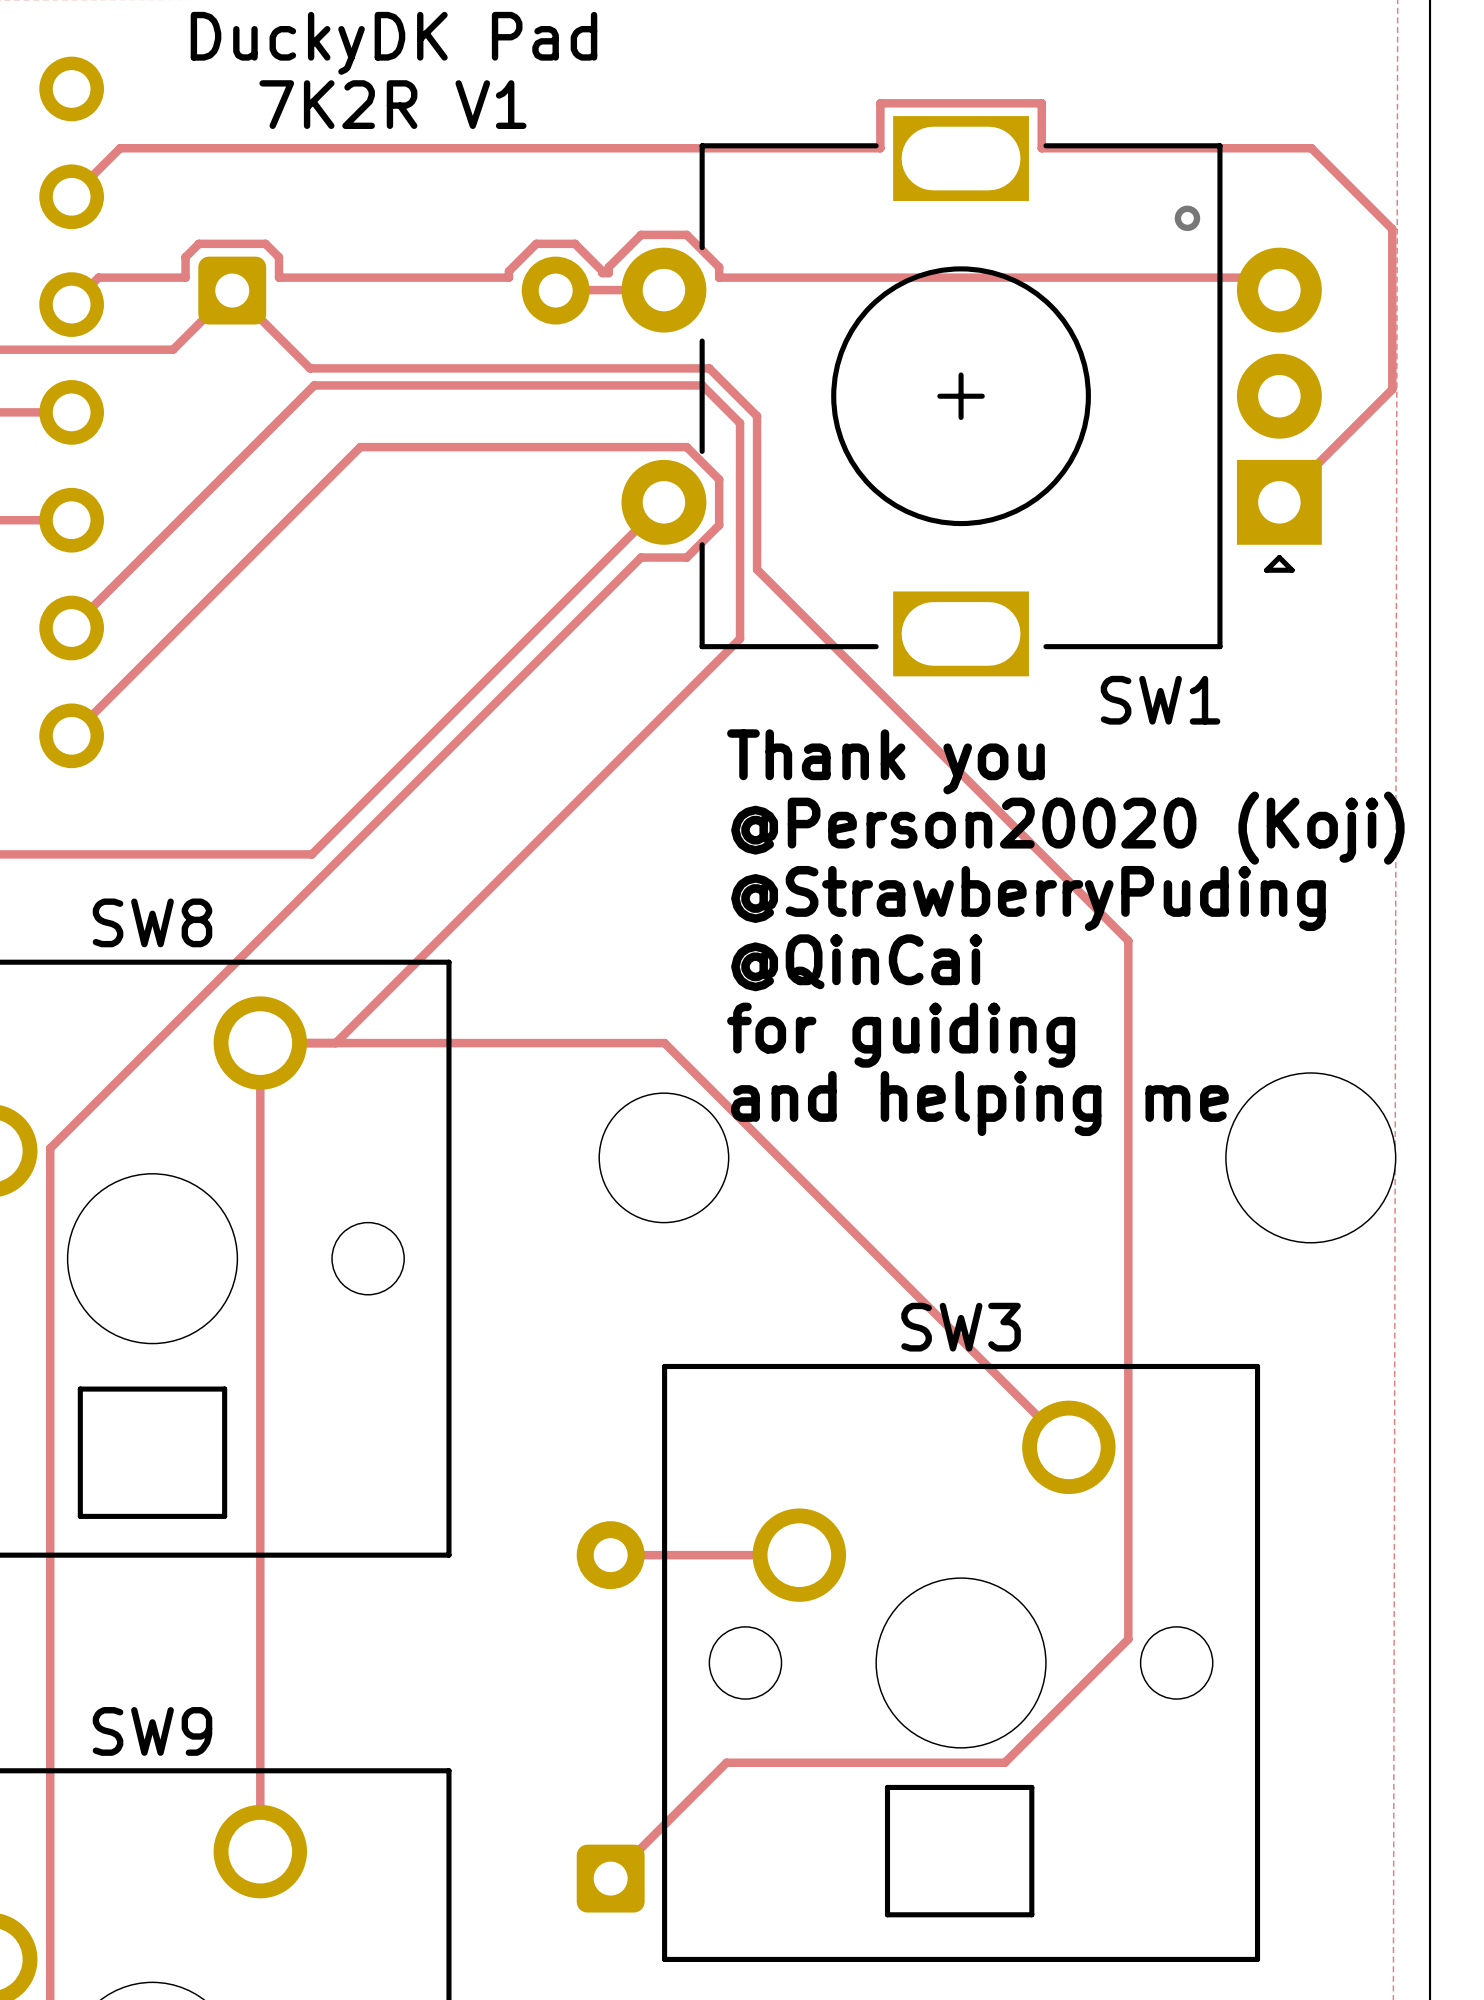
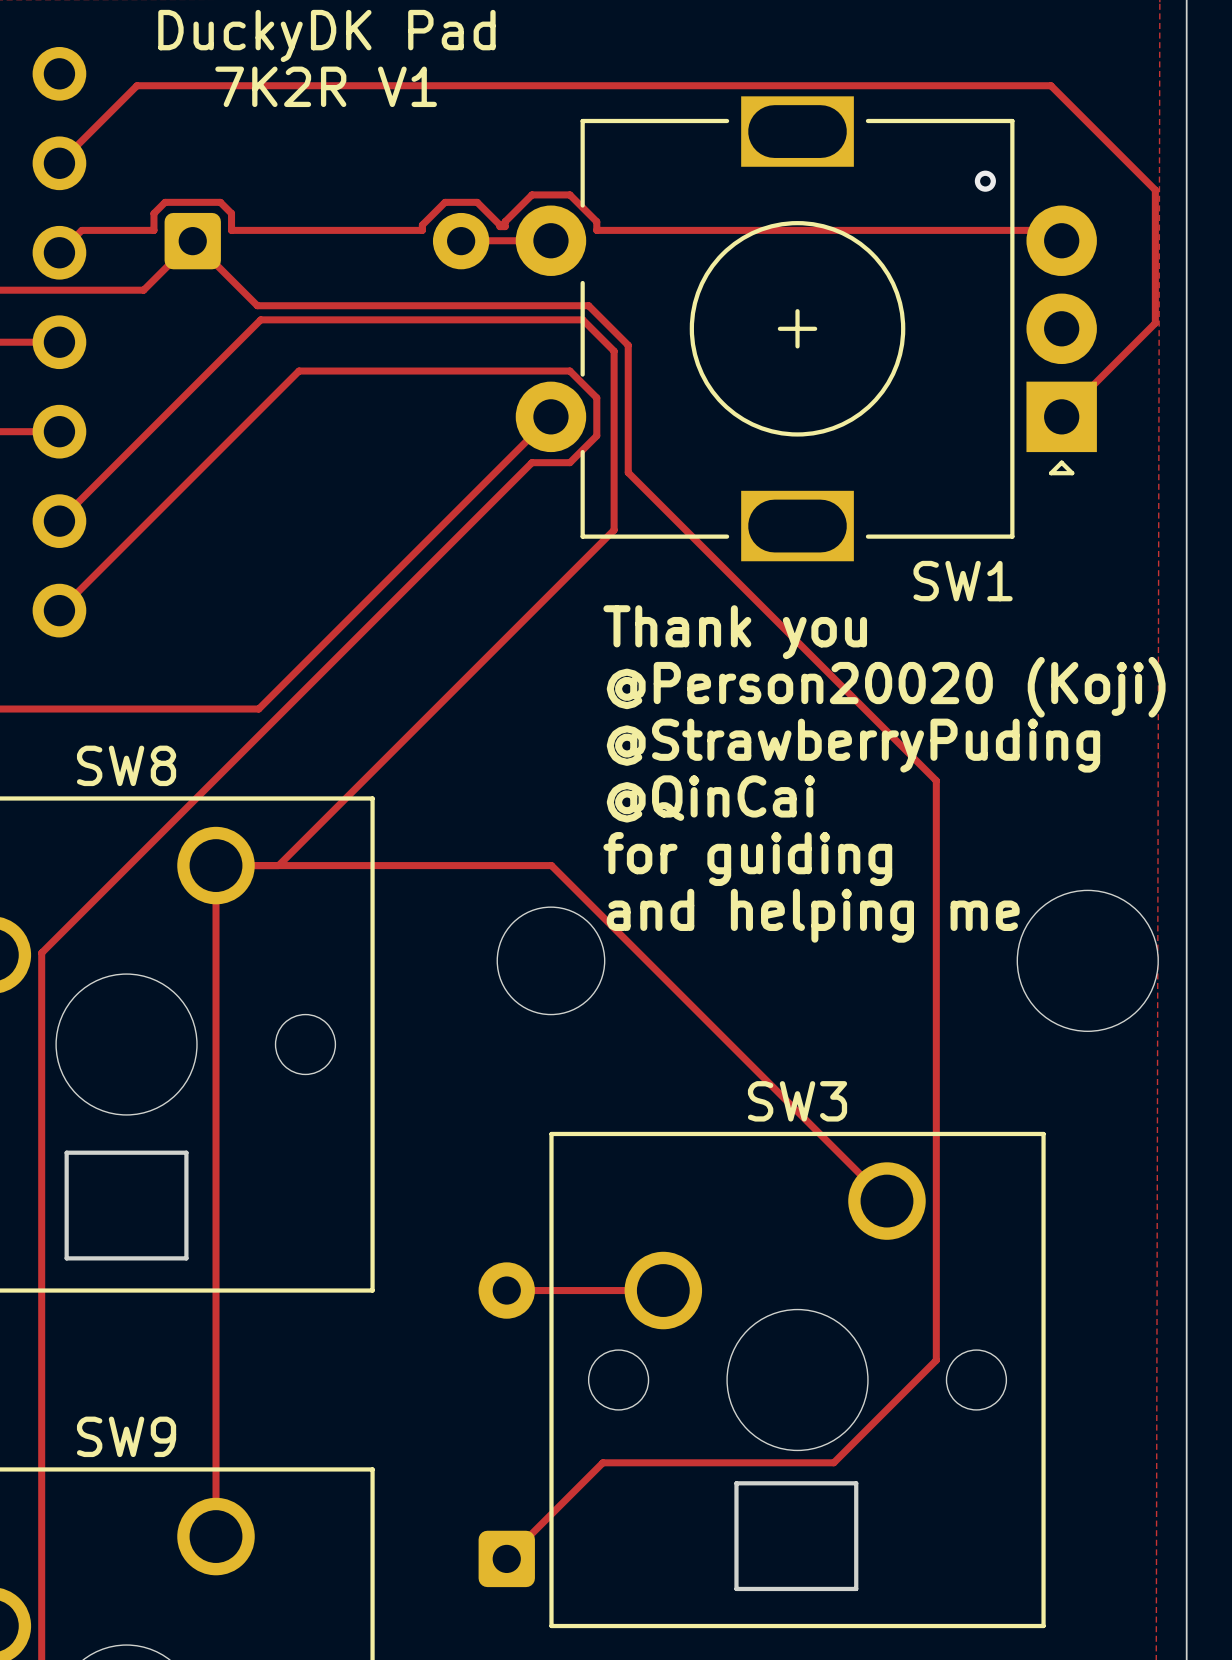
track: (880, 103) (880, 148) (120, 148) -> (730, 85) (137, 85) (99, 123)
track: (1041, 103) (1041, 148) (1311, 148) -> (864, 85) (1050, 85) (1088, 123)

